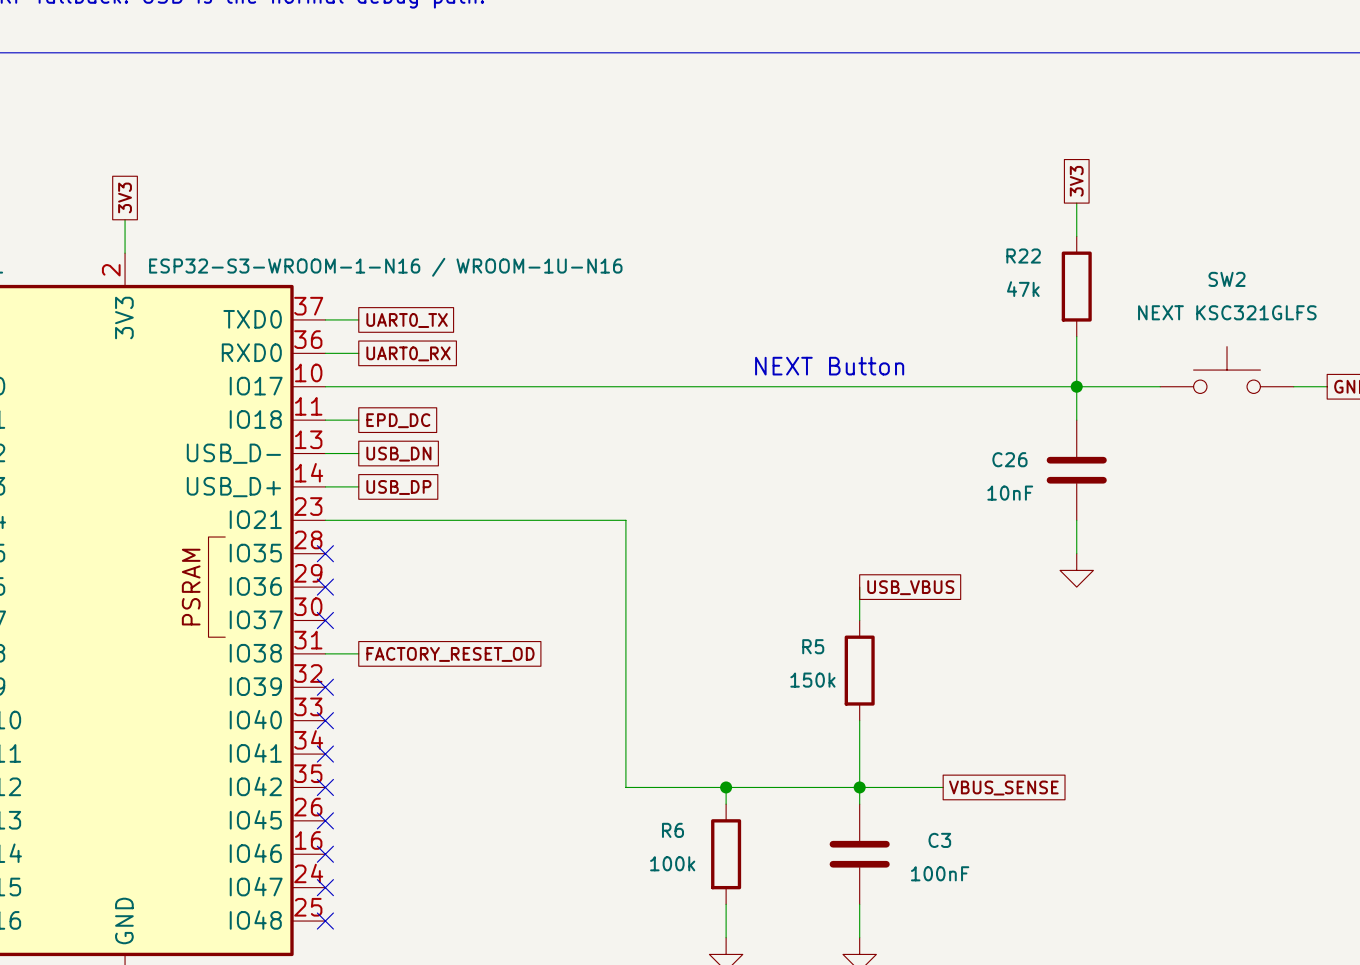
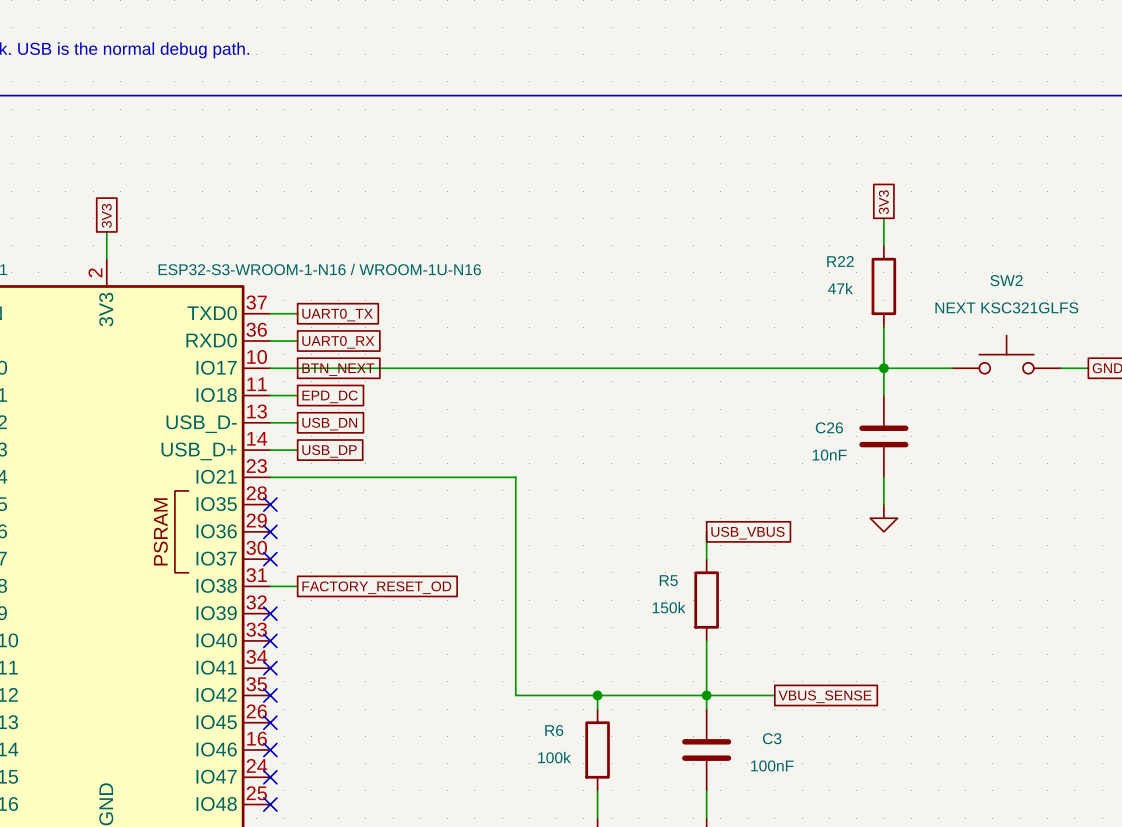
text: NEXT Button (829, 366) -> none
global label: none -> BTN_NEXT (338, 369)

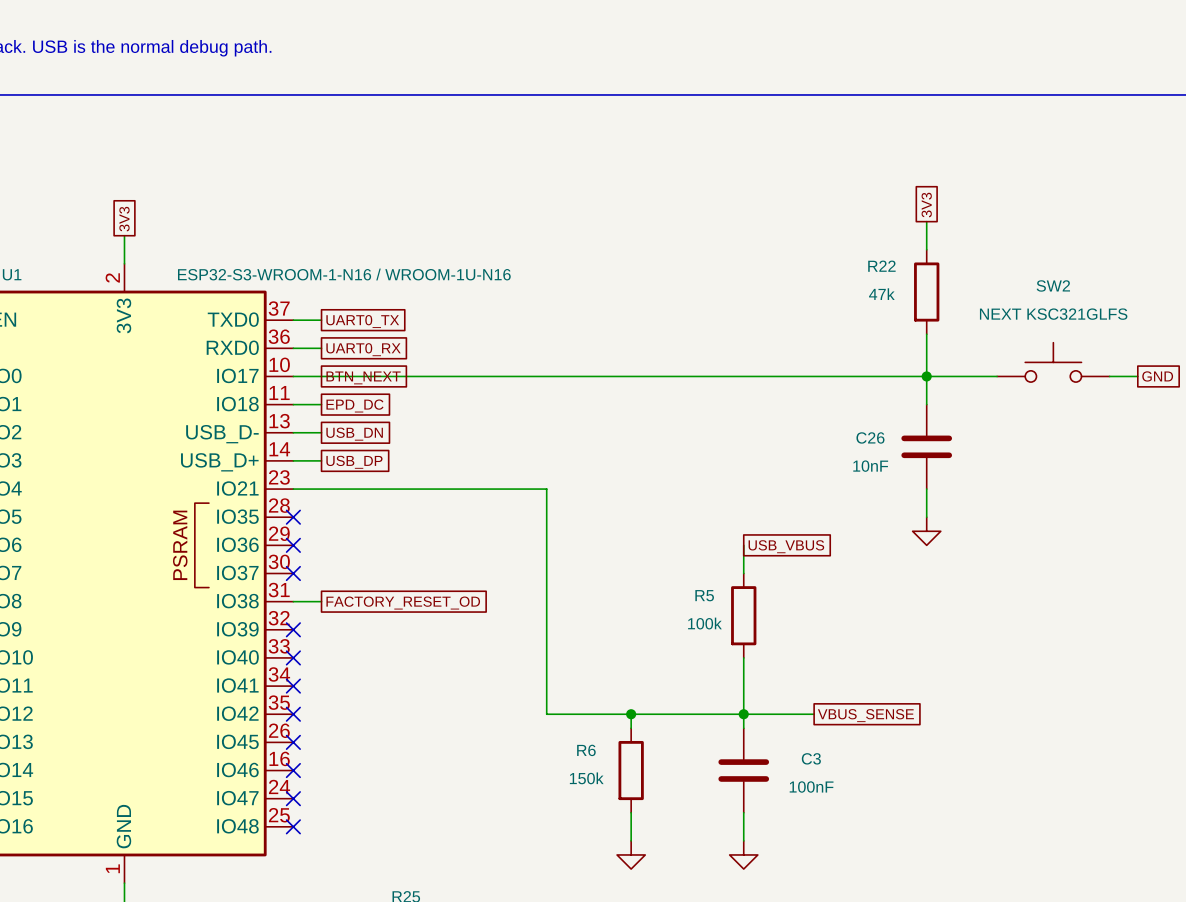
R5 value: 150k (669, 607) -> 100k (704, 623)
R6 value: 100k (554, 757) -> 150k (586, 778)

